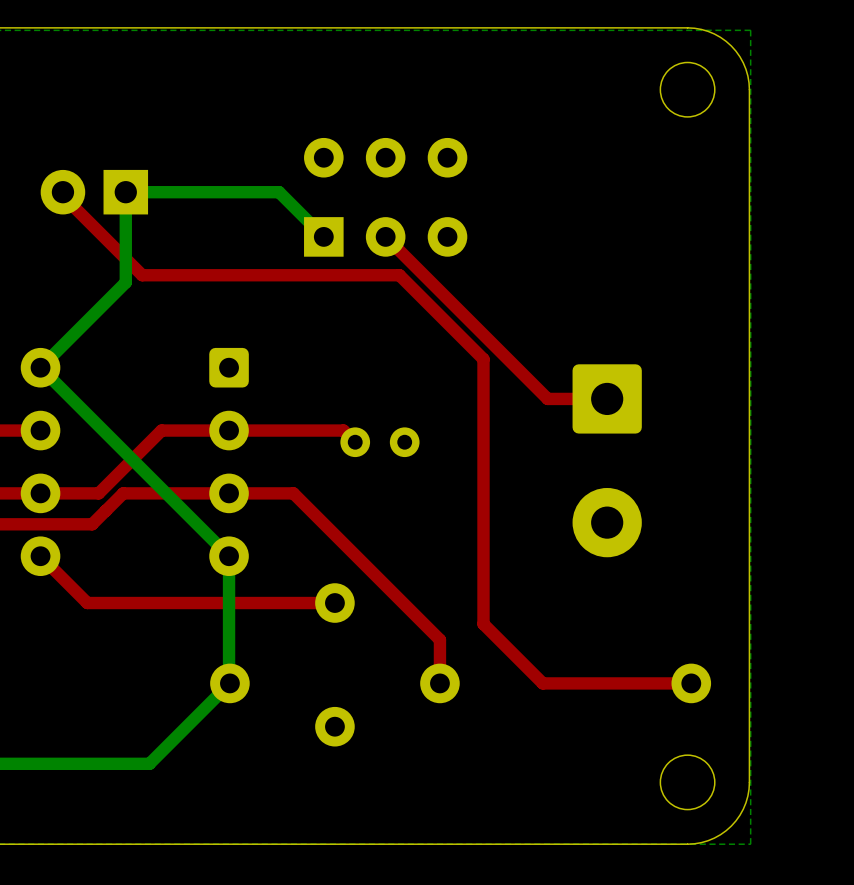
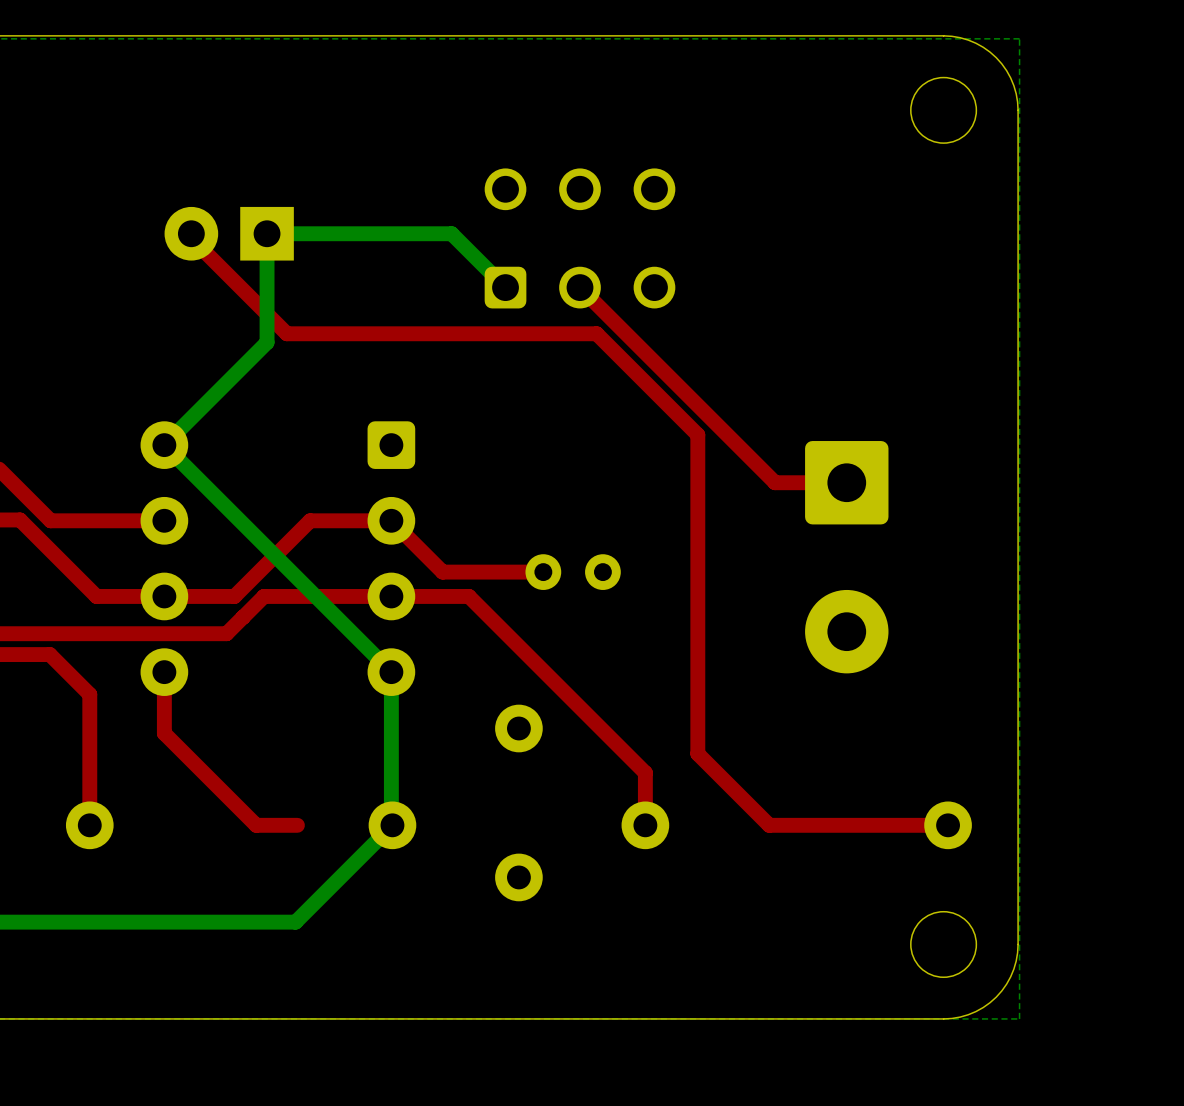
part footprint: [304, 137, 468, 257] -> [484, 168, 676, 309]
top track: (229, 430) (343, 430) (355, 442) -> (391, 520) (442, 572) (543, 572)
part position: (379, 442) -> (573, 572)
top track: (40, 556) (87, 603) (334, 603) -> (164, 672) (164, 733) (256, 825) (297, 825)

